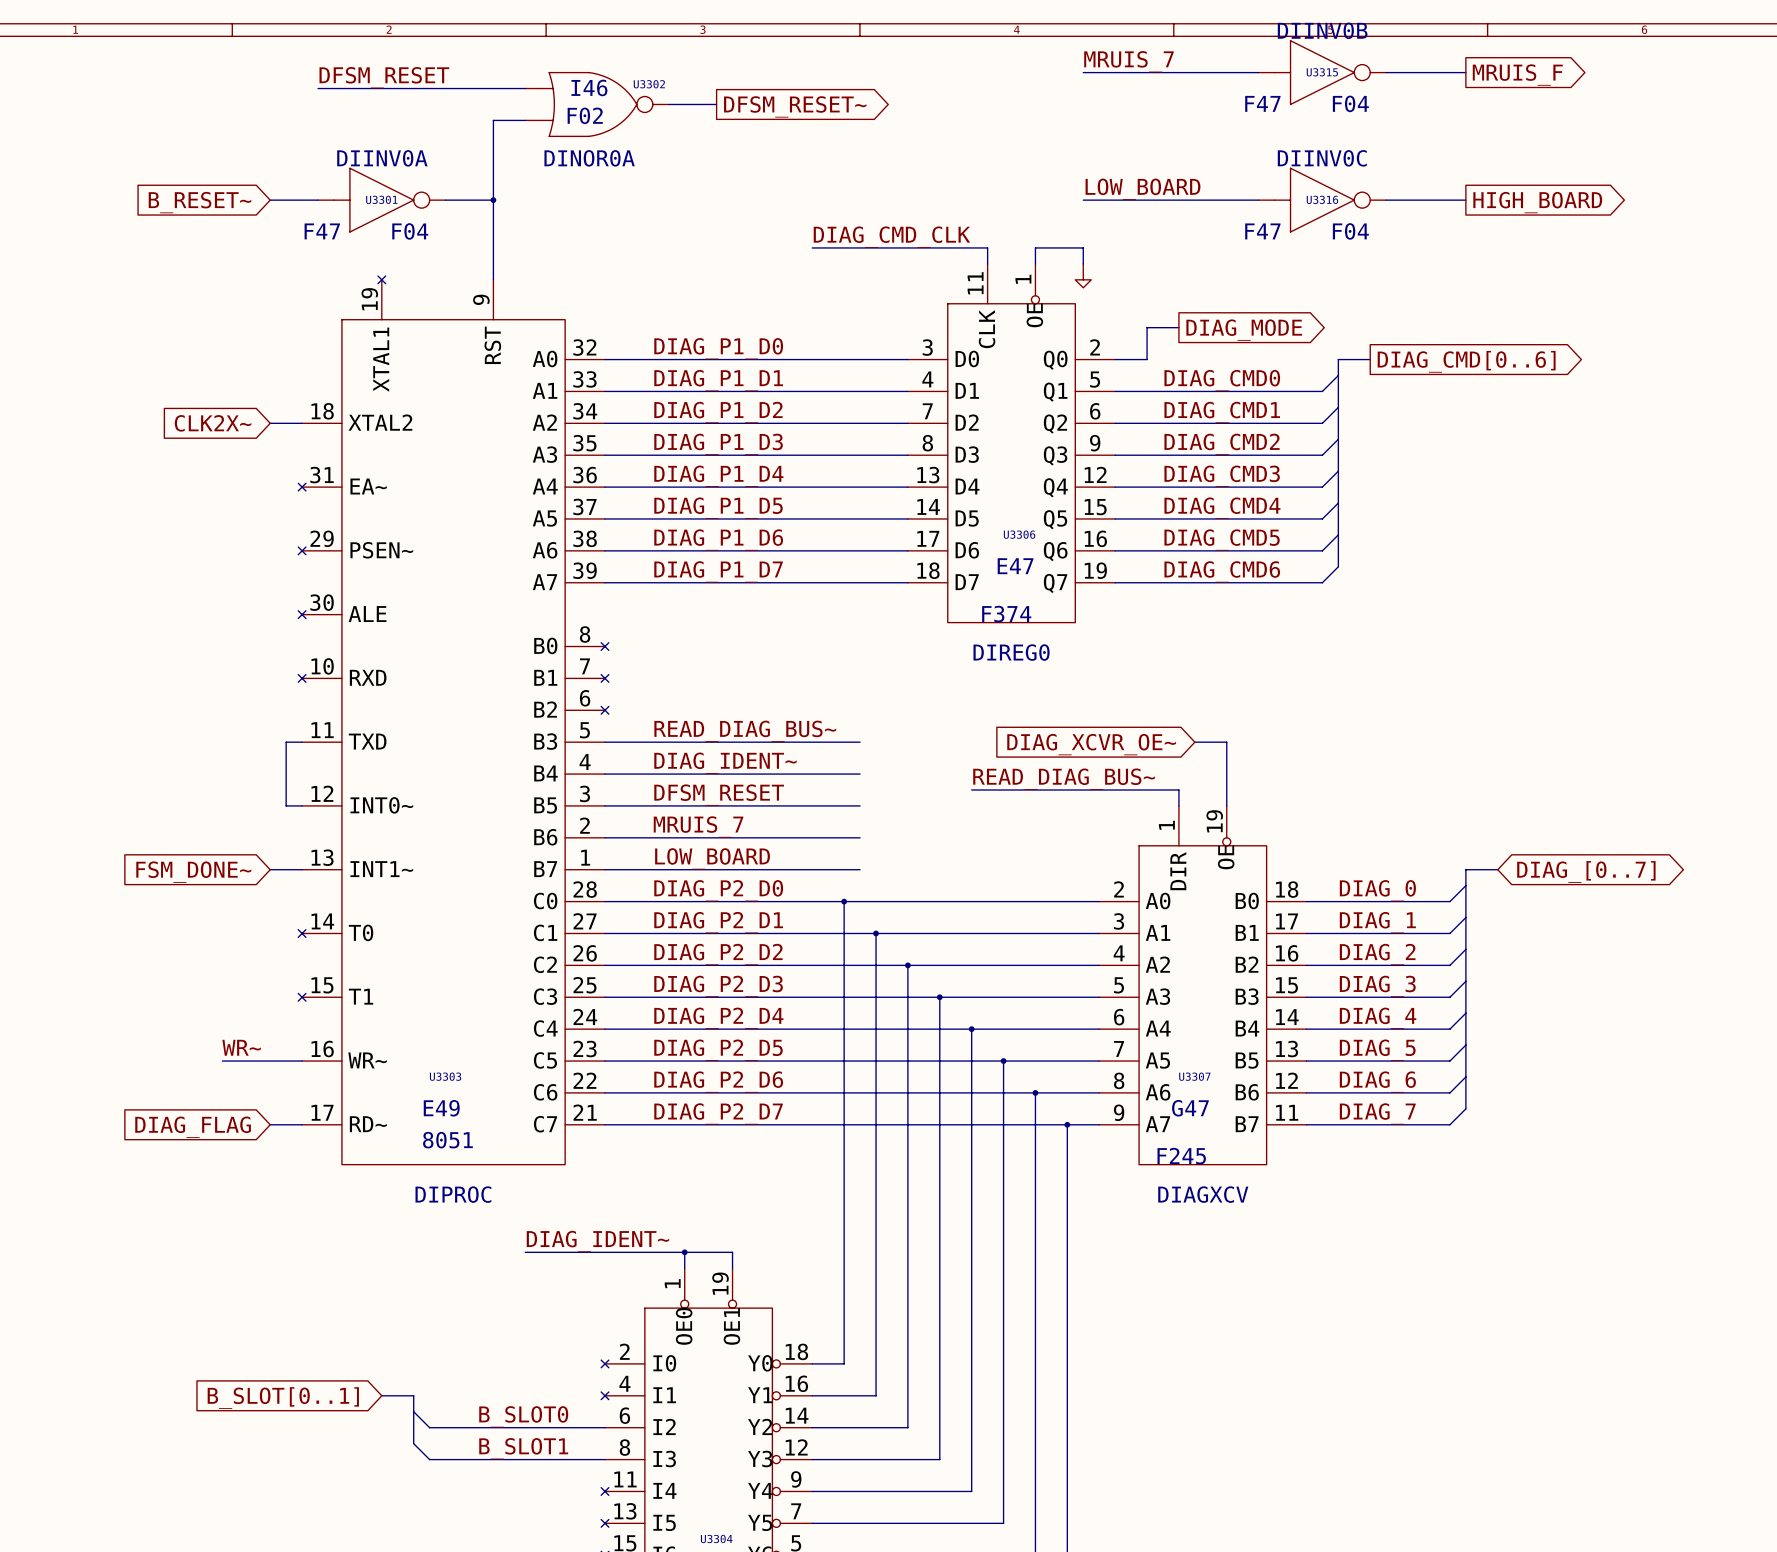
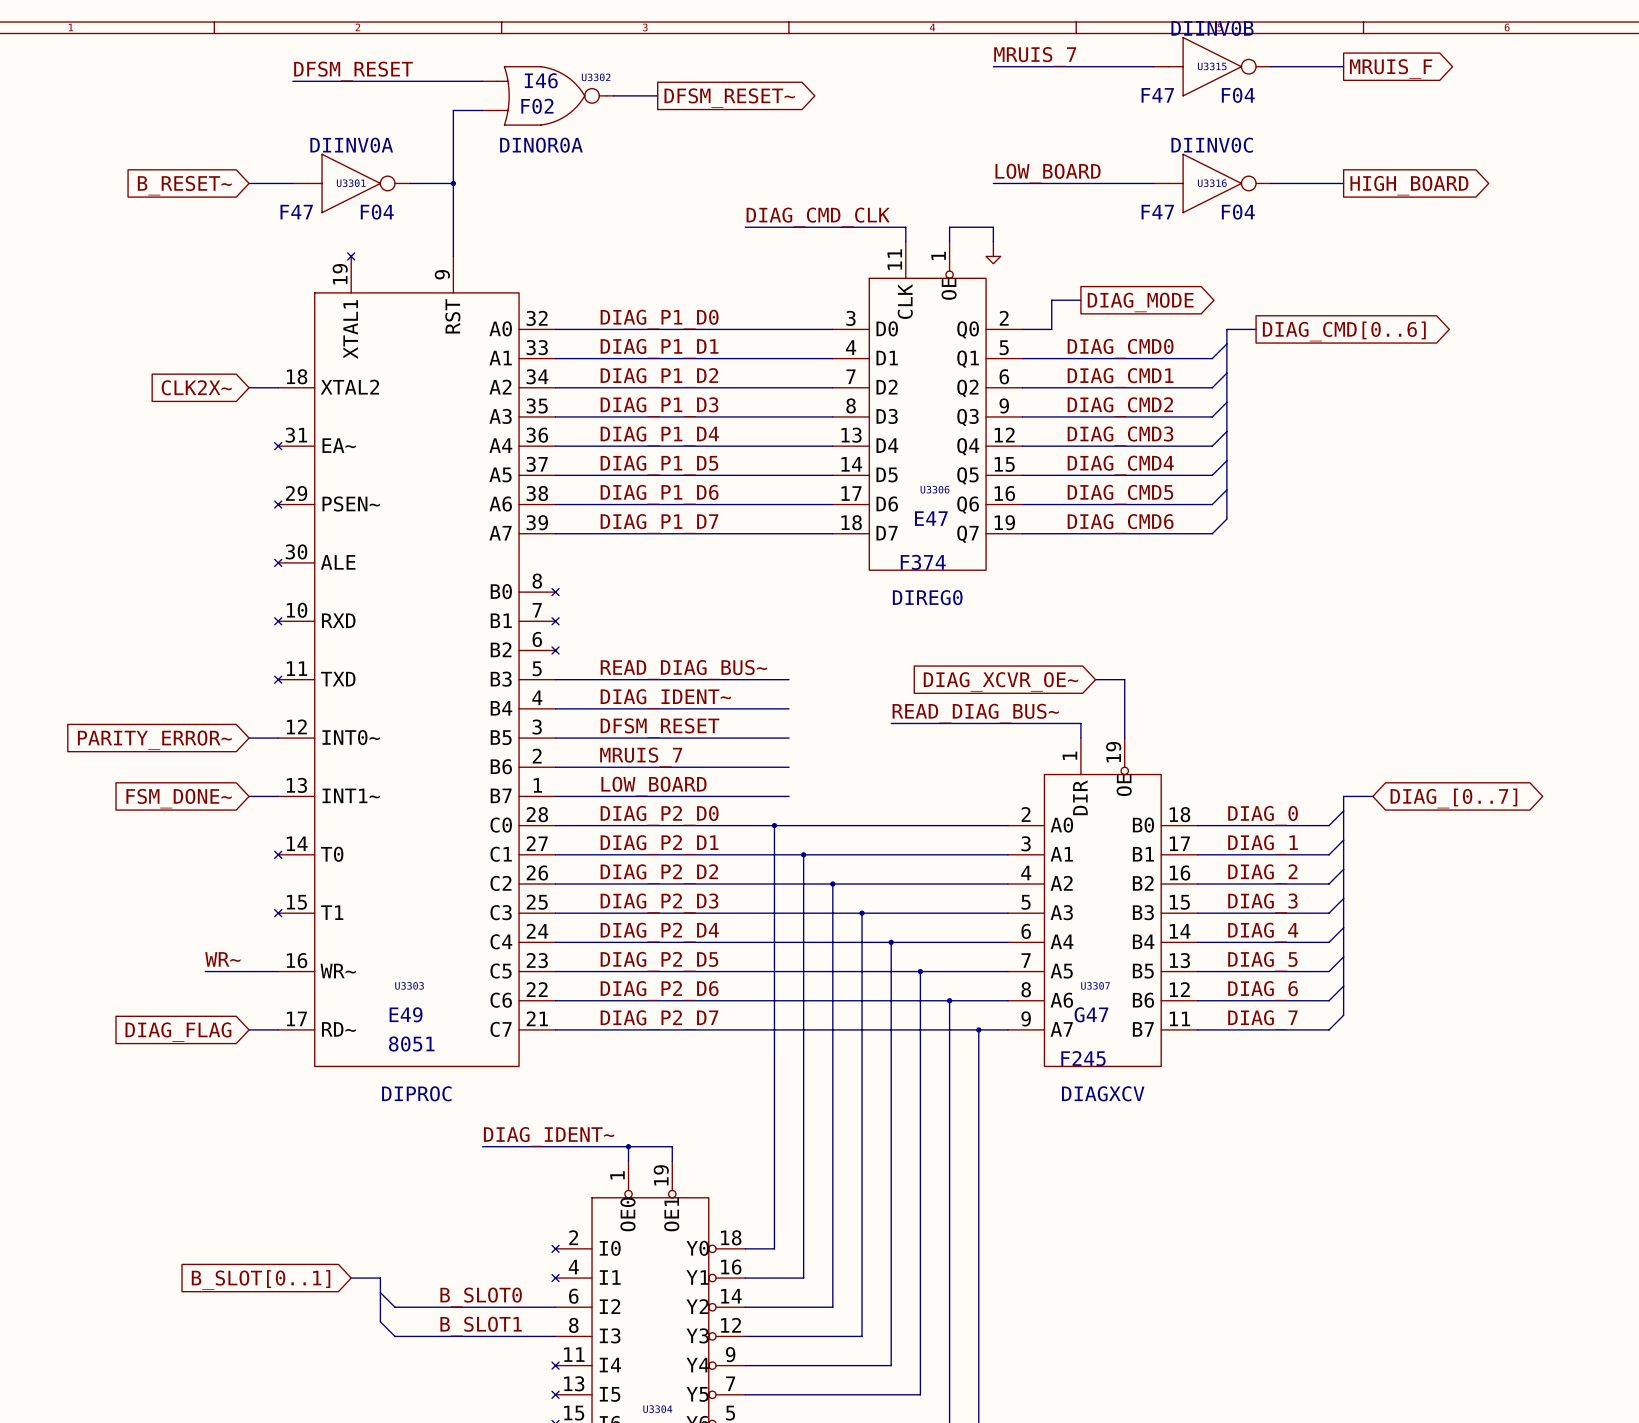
wire: (302, 742) (286, 742) (286, 805) -> (249, 738) (263, 738)
no-connect mark: none -> (278, 679)
global label: none -> PARITY_ERROR~ (154, 740)

